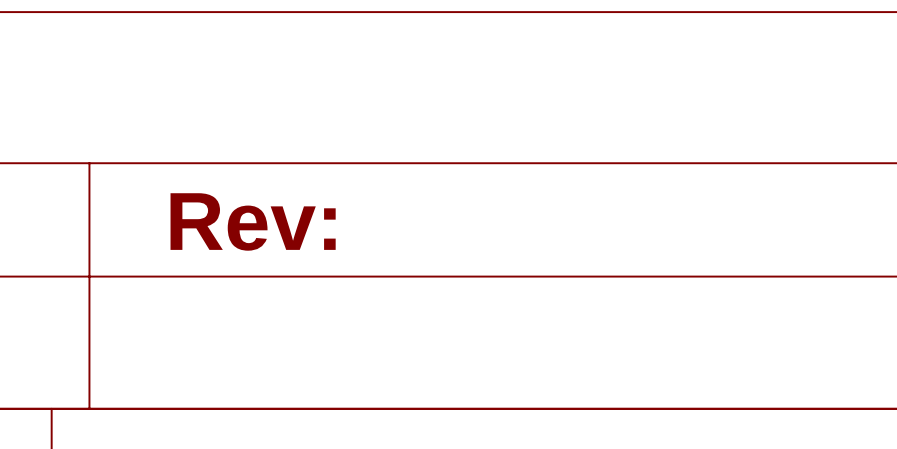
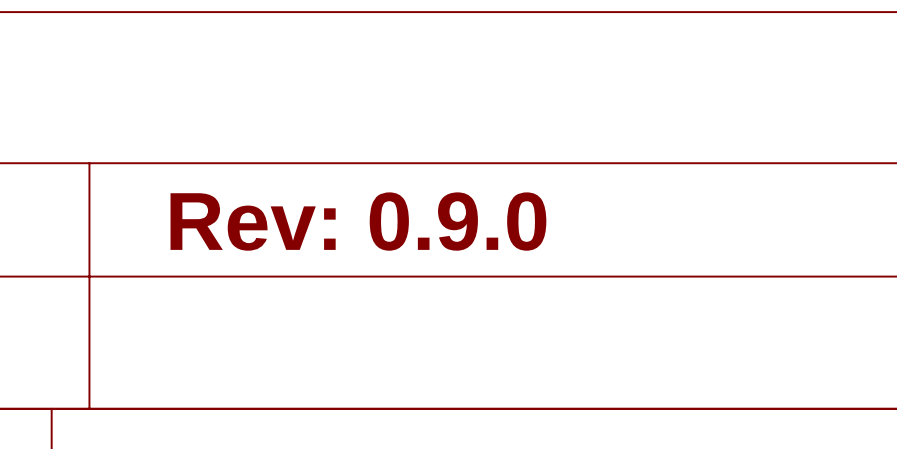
title block: Rev: (253, 221) -> Rev: 0.9.0 (358, 221)

